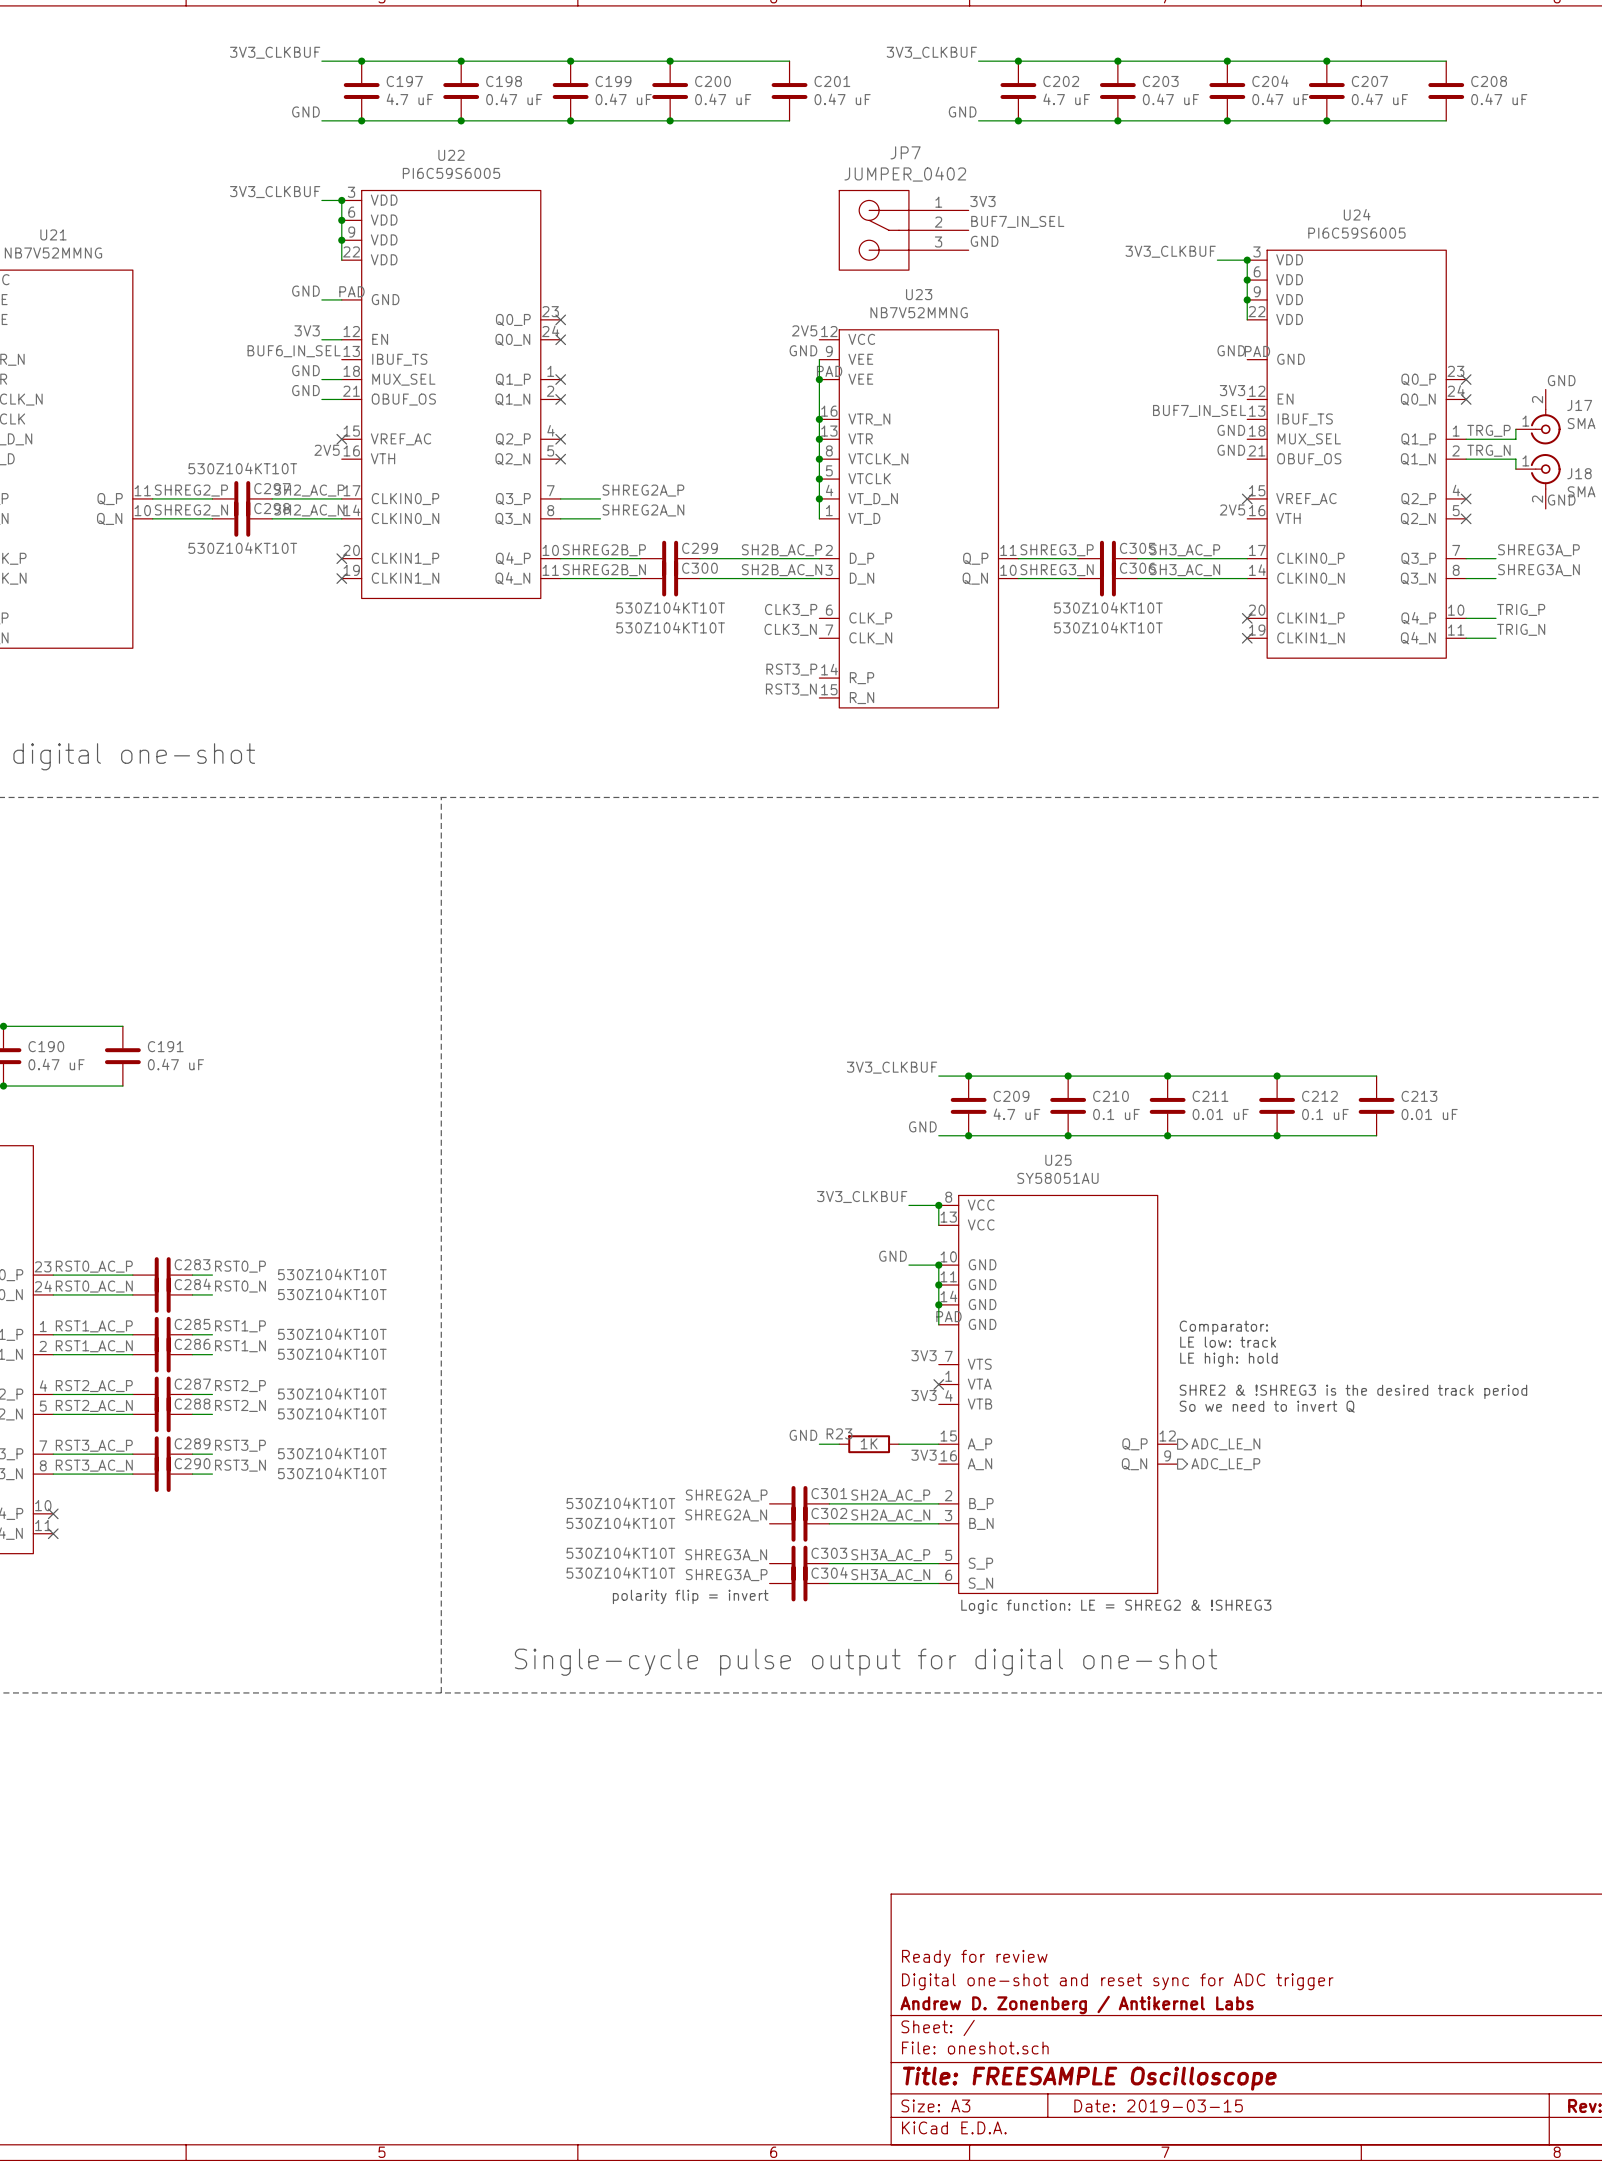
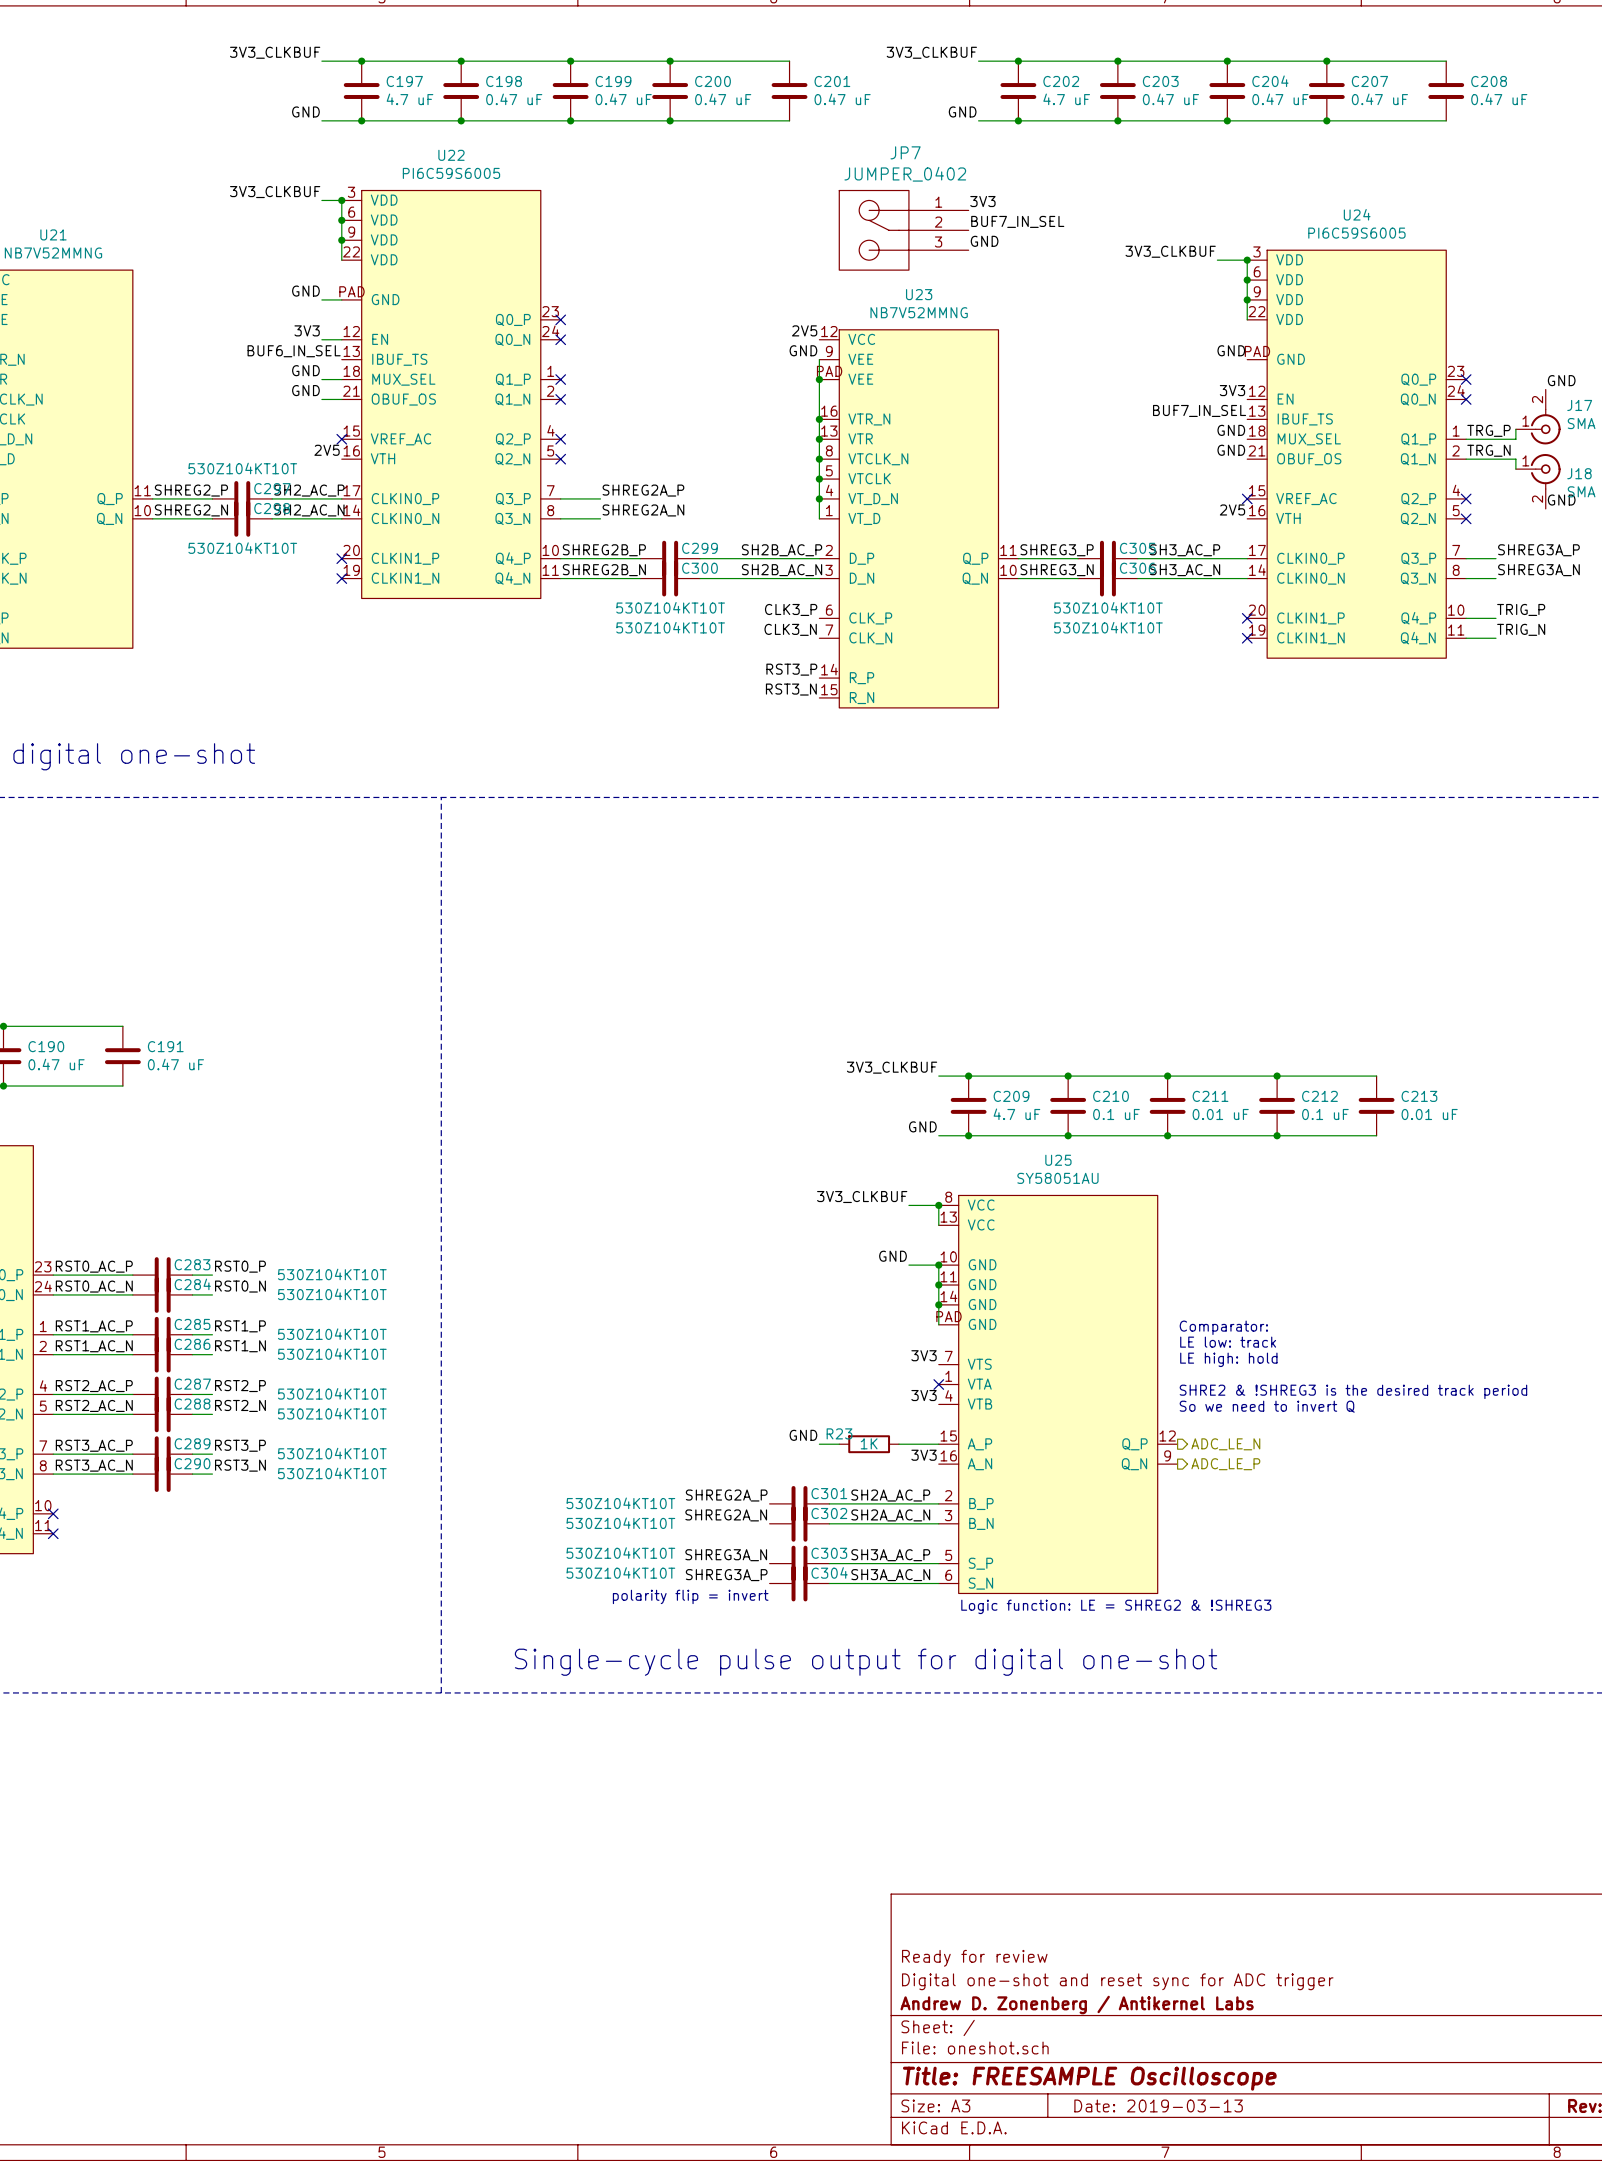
title block: Date: 2019-03-15 (1158, 2105) -> Date: 2019-03-13 (1158, 2105)

